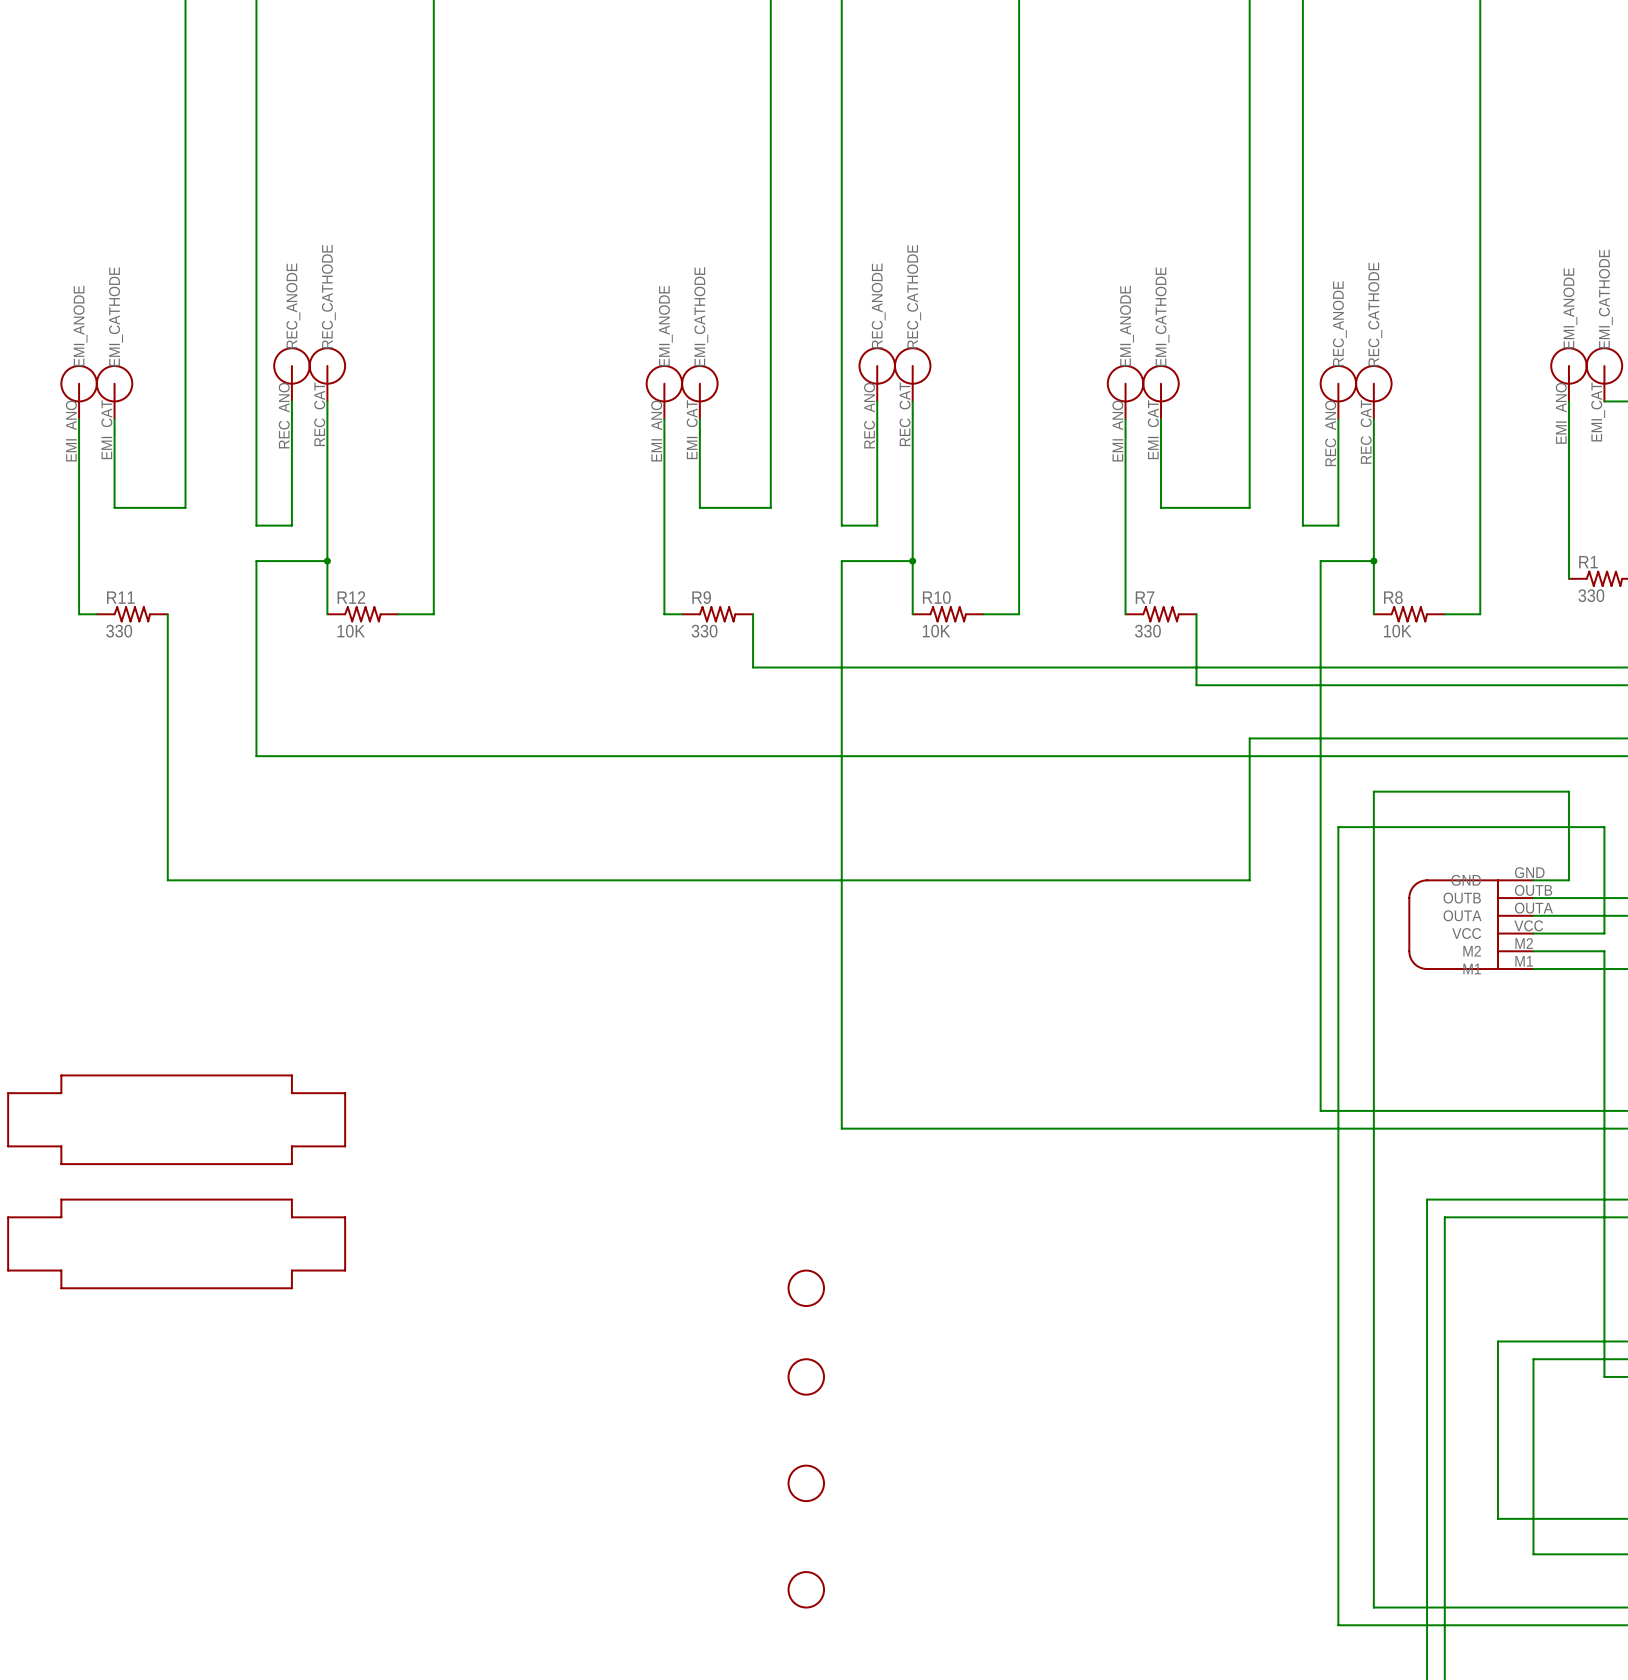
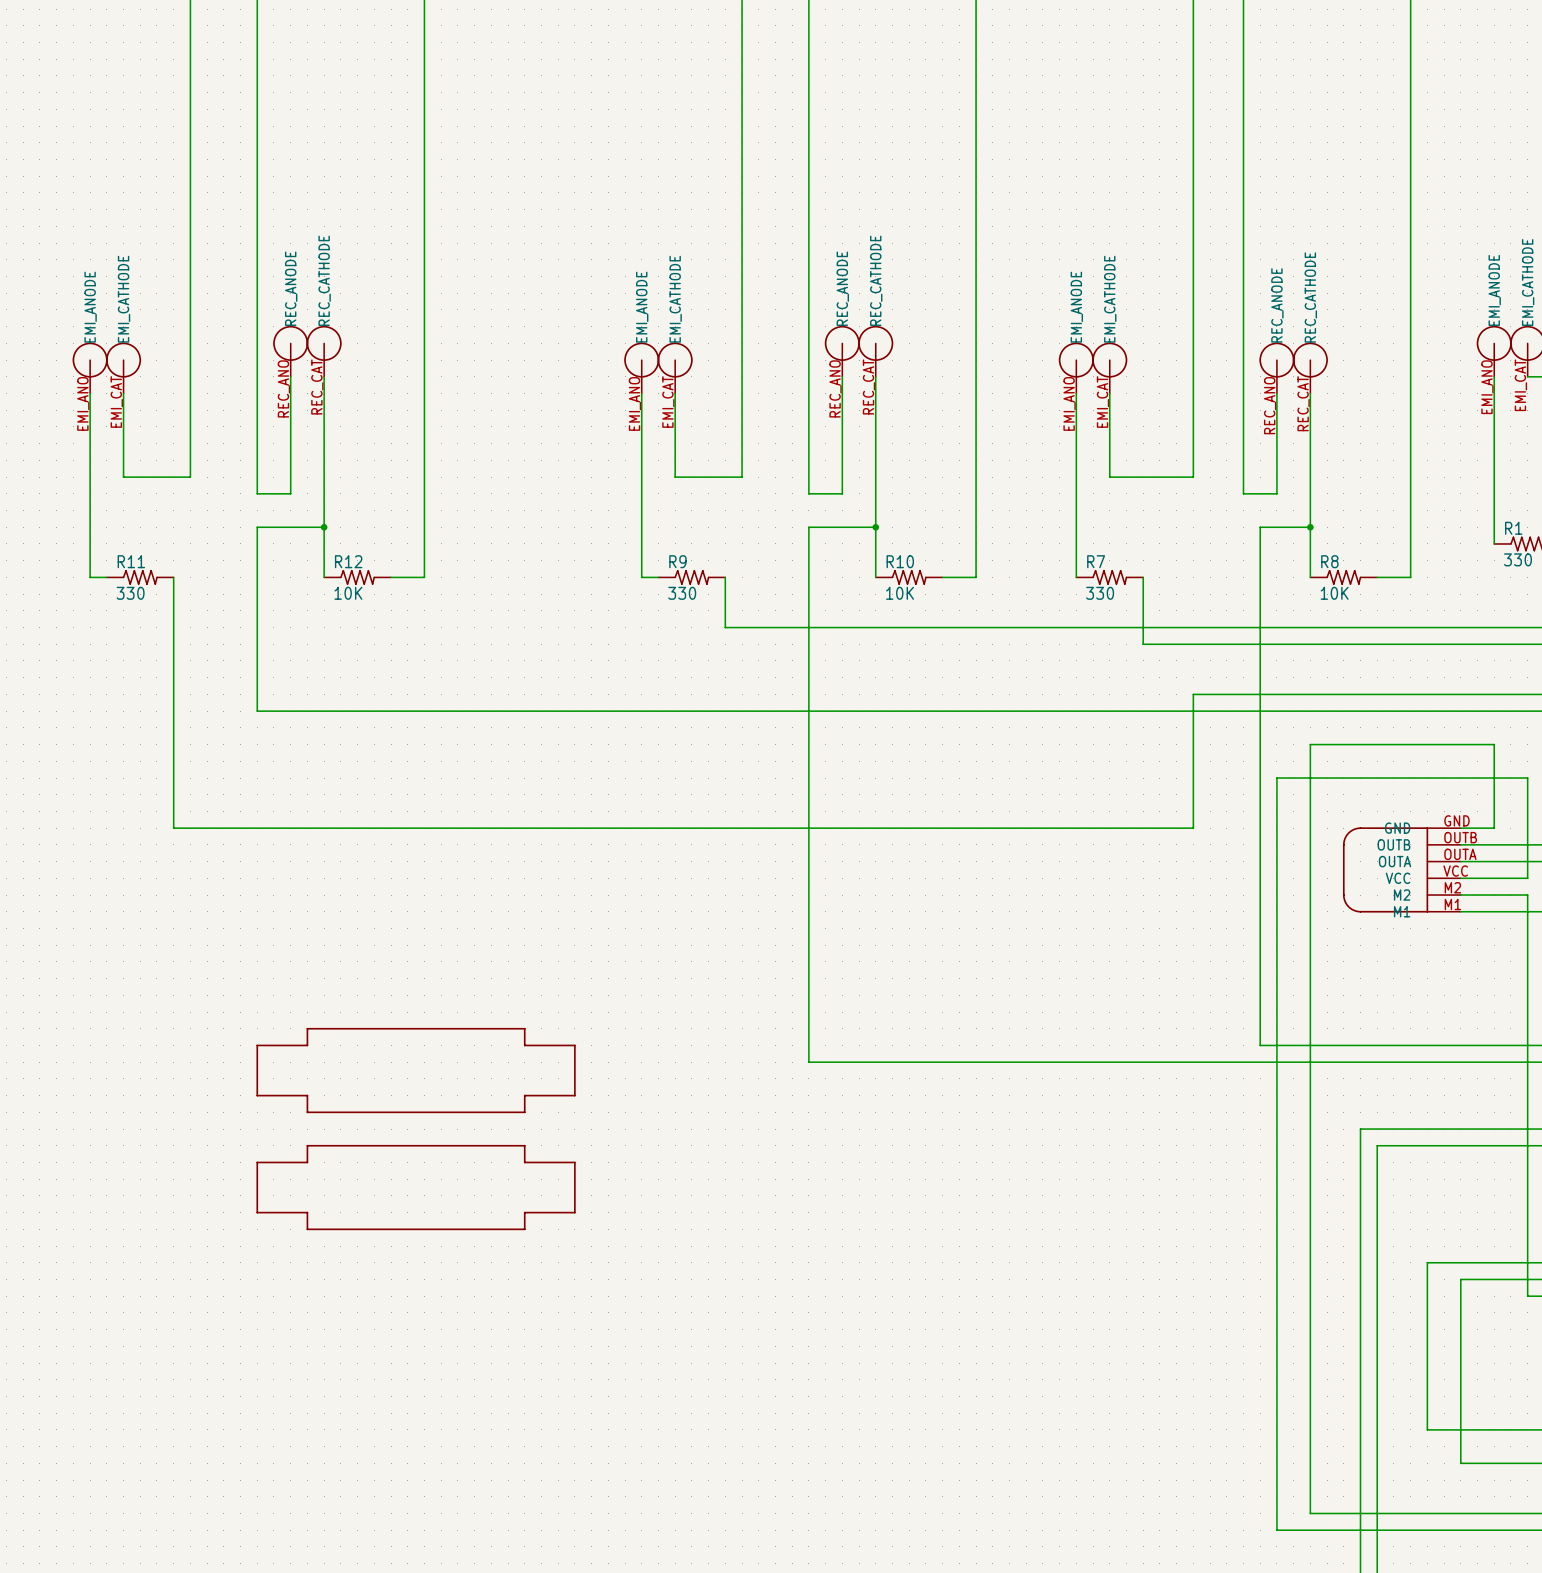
part: (176, 1119) -> none
part: none -> (416, 1070)
part: (176, 1243) -> none
part: none -> (416, 1187)
part: (806, 1288) -> none
part: (806, 1376) -> none
part: (806, 1483) -> none
part: (806, 1589) -> none

